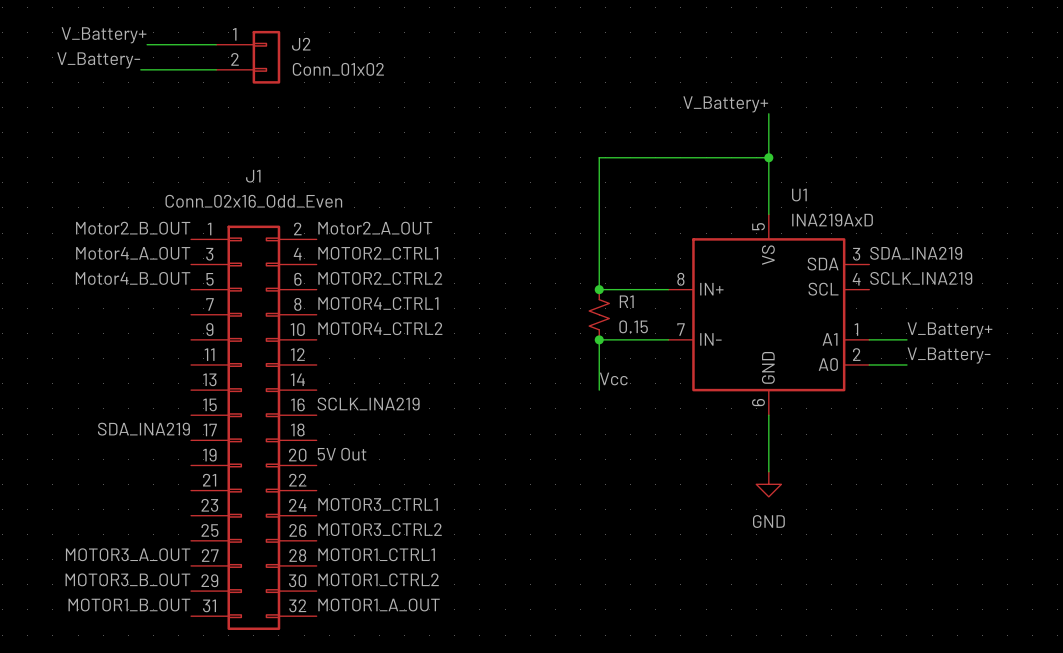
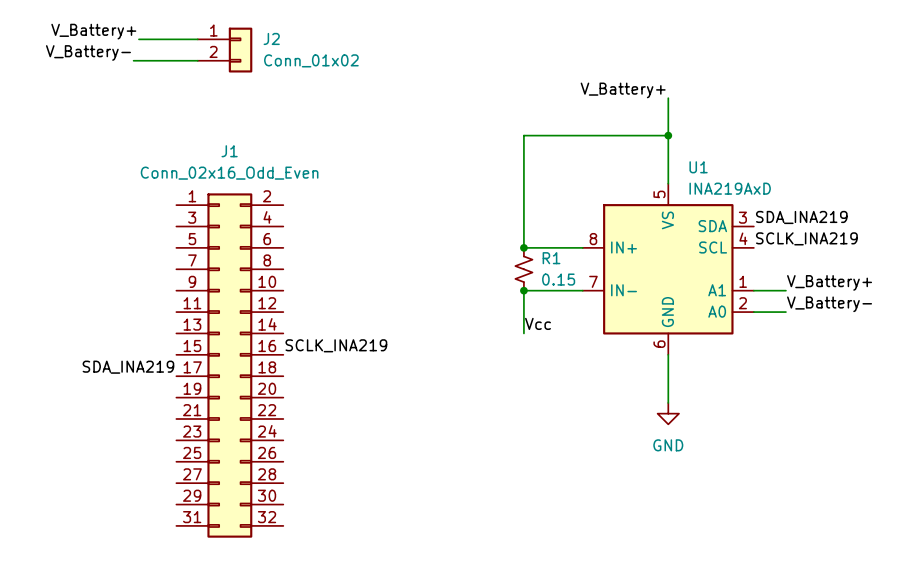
label: Motor2_B_OUT (133, 228) -> none
label: Motor2_A_OUT (375, 228) -> none
label: Motor4_A_OUT (133, 253) -> none
label: MOTOR2_CTRL1 (378, 253) -> none
label: Motor4_B_OUT (133, 278) -> none
label: MOTOR2_CTRL2 (380, 278) -> none
label: MOTOR4_CTRL1 (378, 303) -> none
label: MOTOR4_CTRL2 (380, 328) -> none
label: 5V Out (342, 454) -> none
label: MOTOR3_CTRL1 (378, 504) -> none
label: MOTOR3_CTRL2 (380, 529) -> none
label: MOTOR3_A_OUT (128, 554) -> none
label: MOTOR1_CTRL1 (376, 554) -> none
label: MOTOR3_B_OUT (127, 579) -> none
label: MOTOR1_CTRL2 (378, 579) -> none
label: MOTOR1_B_OUT (129, 604) -> none
label: MOTOR1_A_OUT (379, 604) -> none

